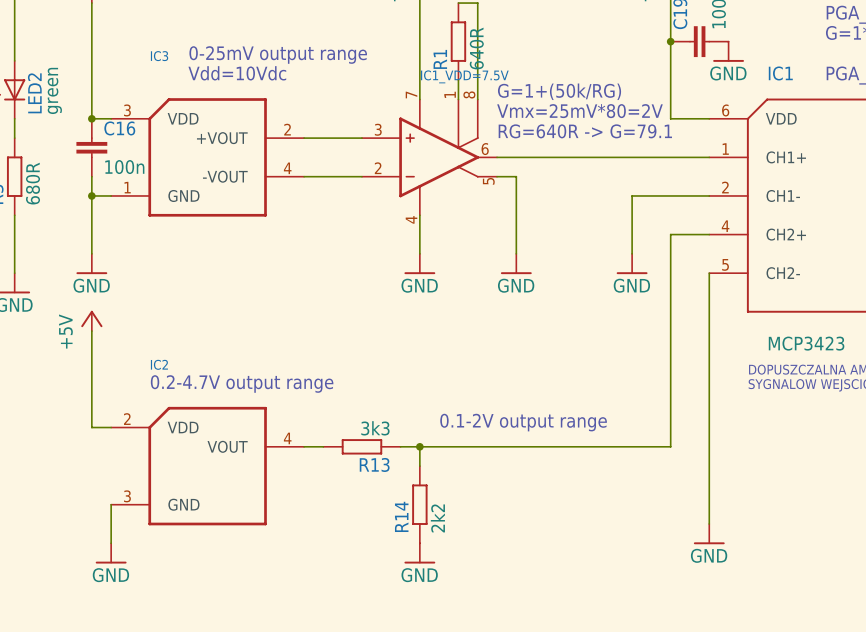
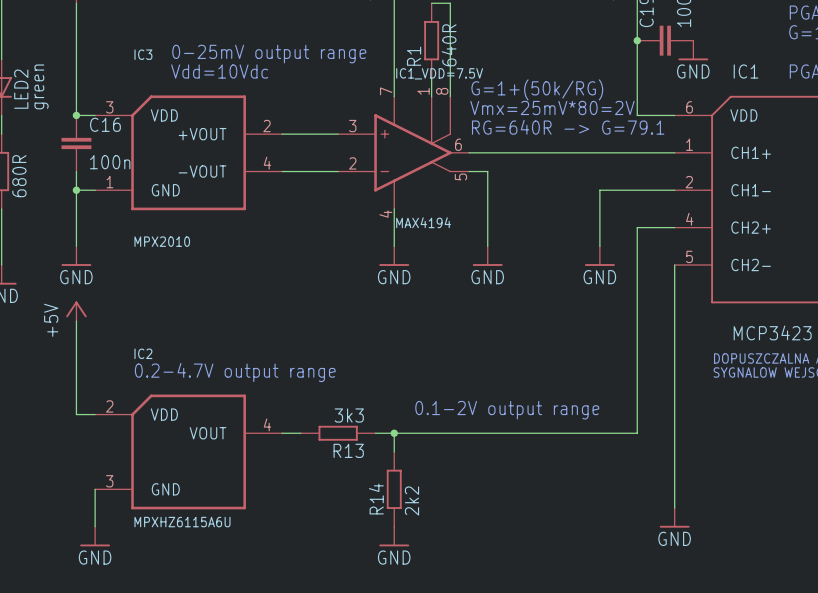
IC1_VDD=7.5V value: none -> MAX4194 (423, 222)
IC3 value: none -> MPX2010 (162, 241)
IC2 value: none -> MPXHZ6115A6U (182, 522)

